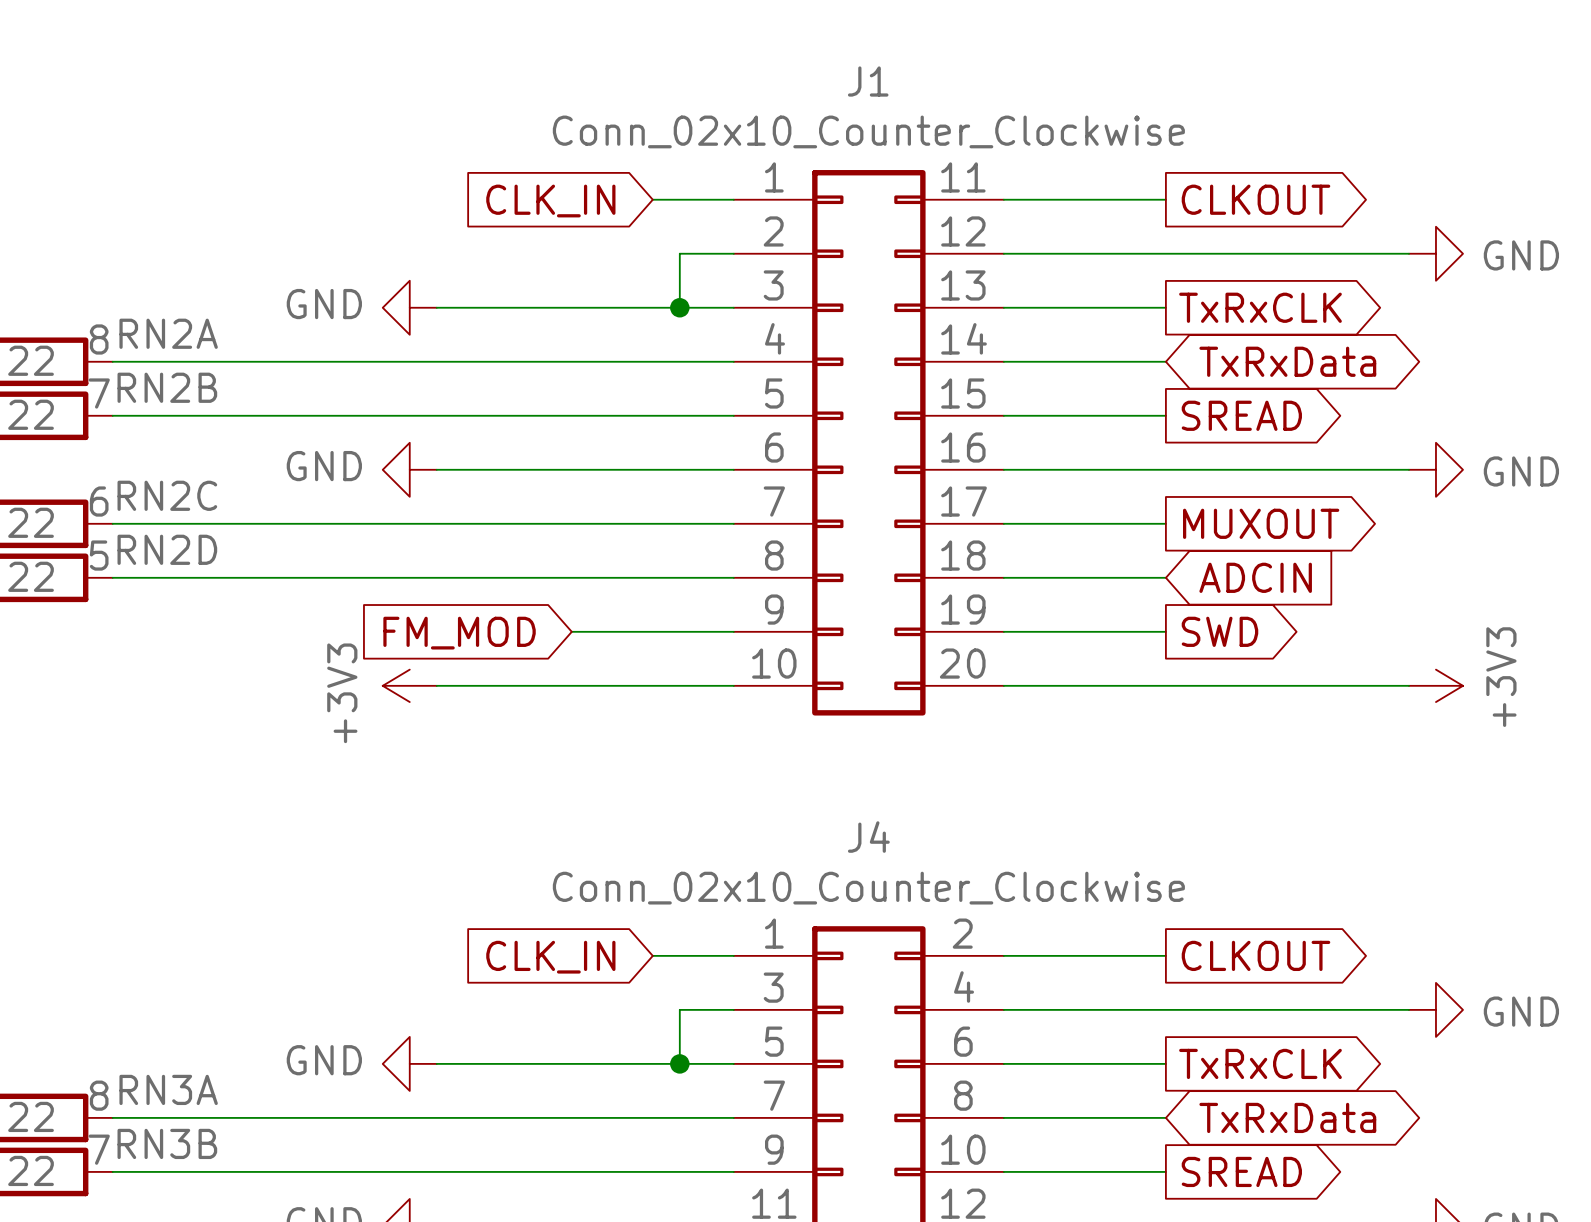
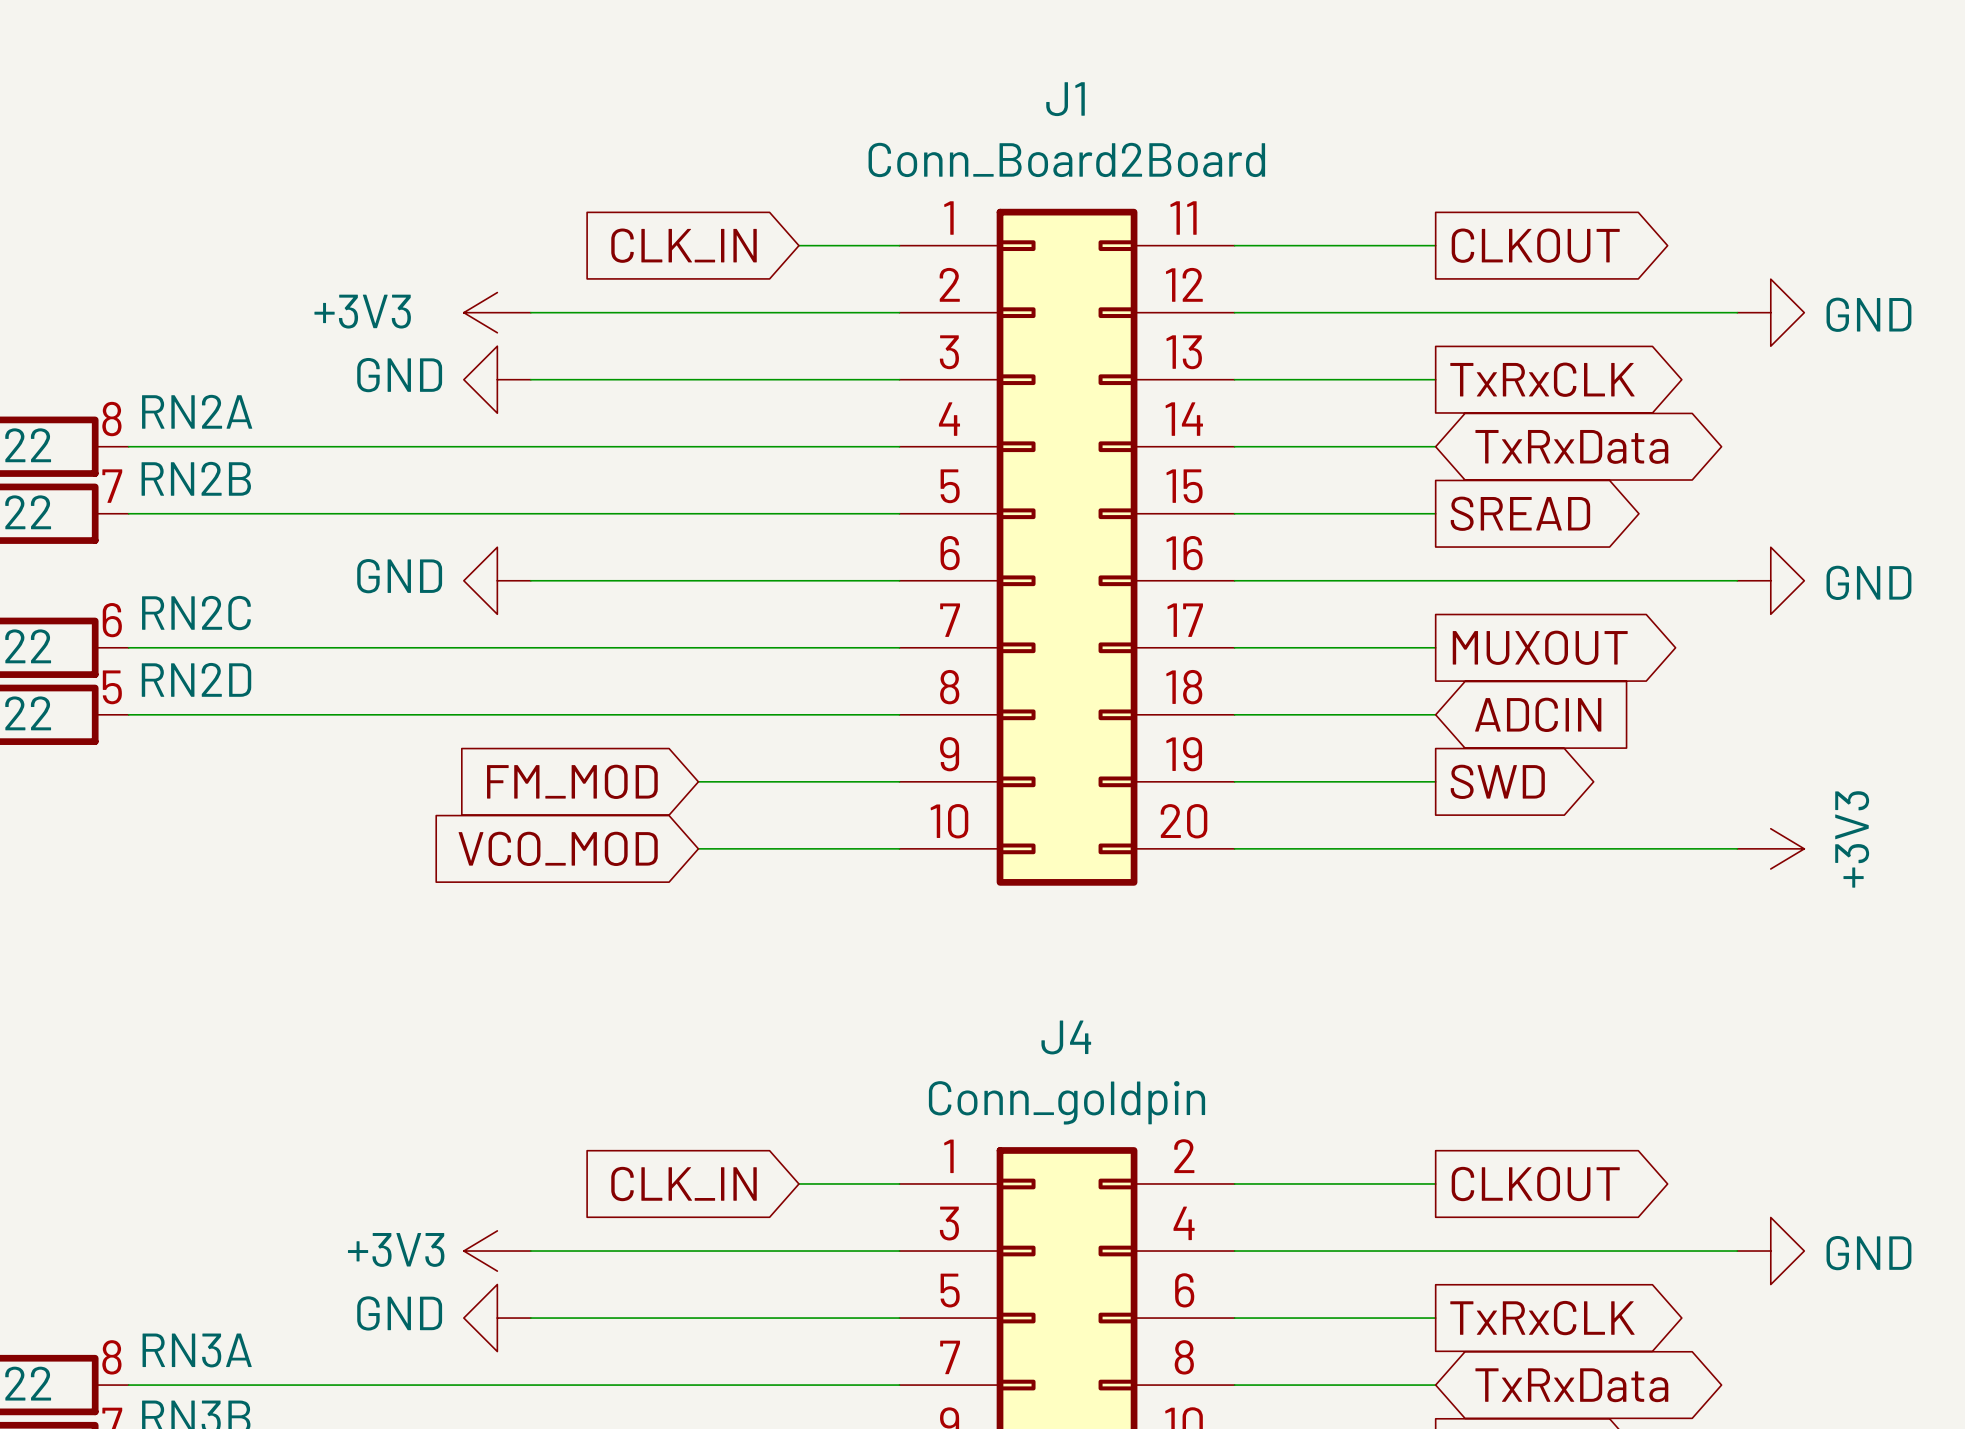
J1 value: Conn_02x10_Counter_Clockwise (868, 131) -> Conn_Board2Board (1066, 159)
power symbol: none -> +3V3 (497, 312)
wire: (679, 253) (679, 307) -> (832, 312) (530, 312)
junction: (679, 307) -> none
power symbol: +3V3 (409, 685) -> none
wire: (436, 685) (571, 685) -> none
global label: none -> VCO_MOD (558, 848)
J4 value: Conn_02x10_Counter_Clockwise (868, 888) -> Conn_goldpin (1067, 1102)
power symbol: none -> +3V3 (497, 1251)
wire: (679, 1009) (679, 1063) -> (832, 1251) (530, 1251)
junction: (679, 1063) -> none

